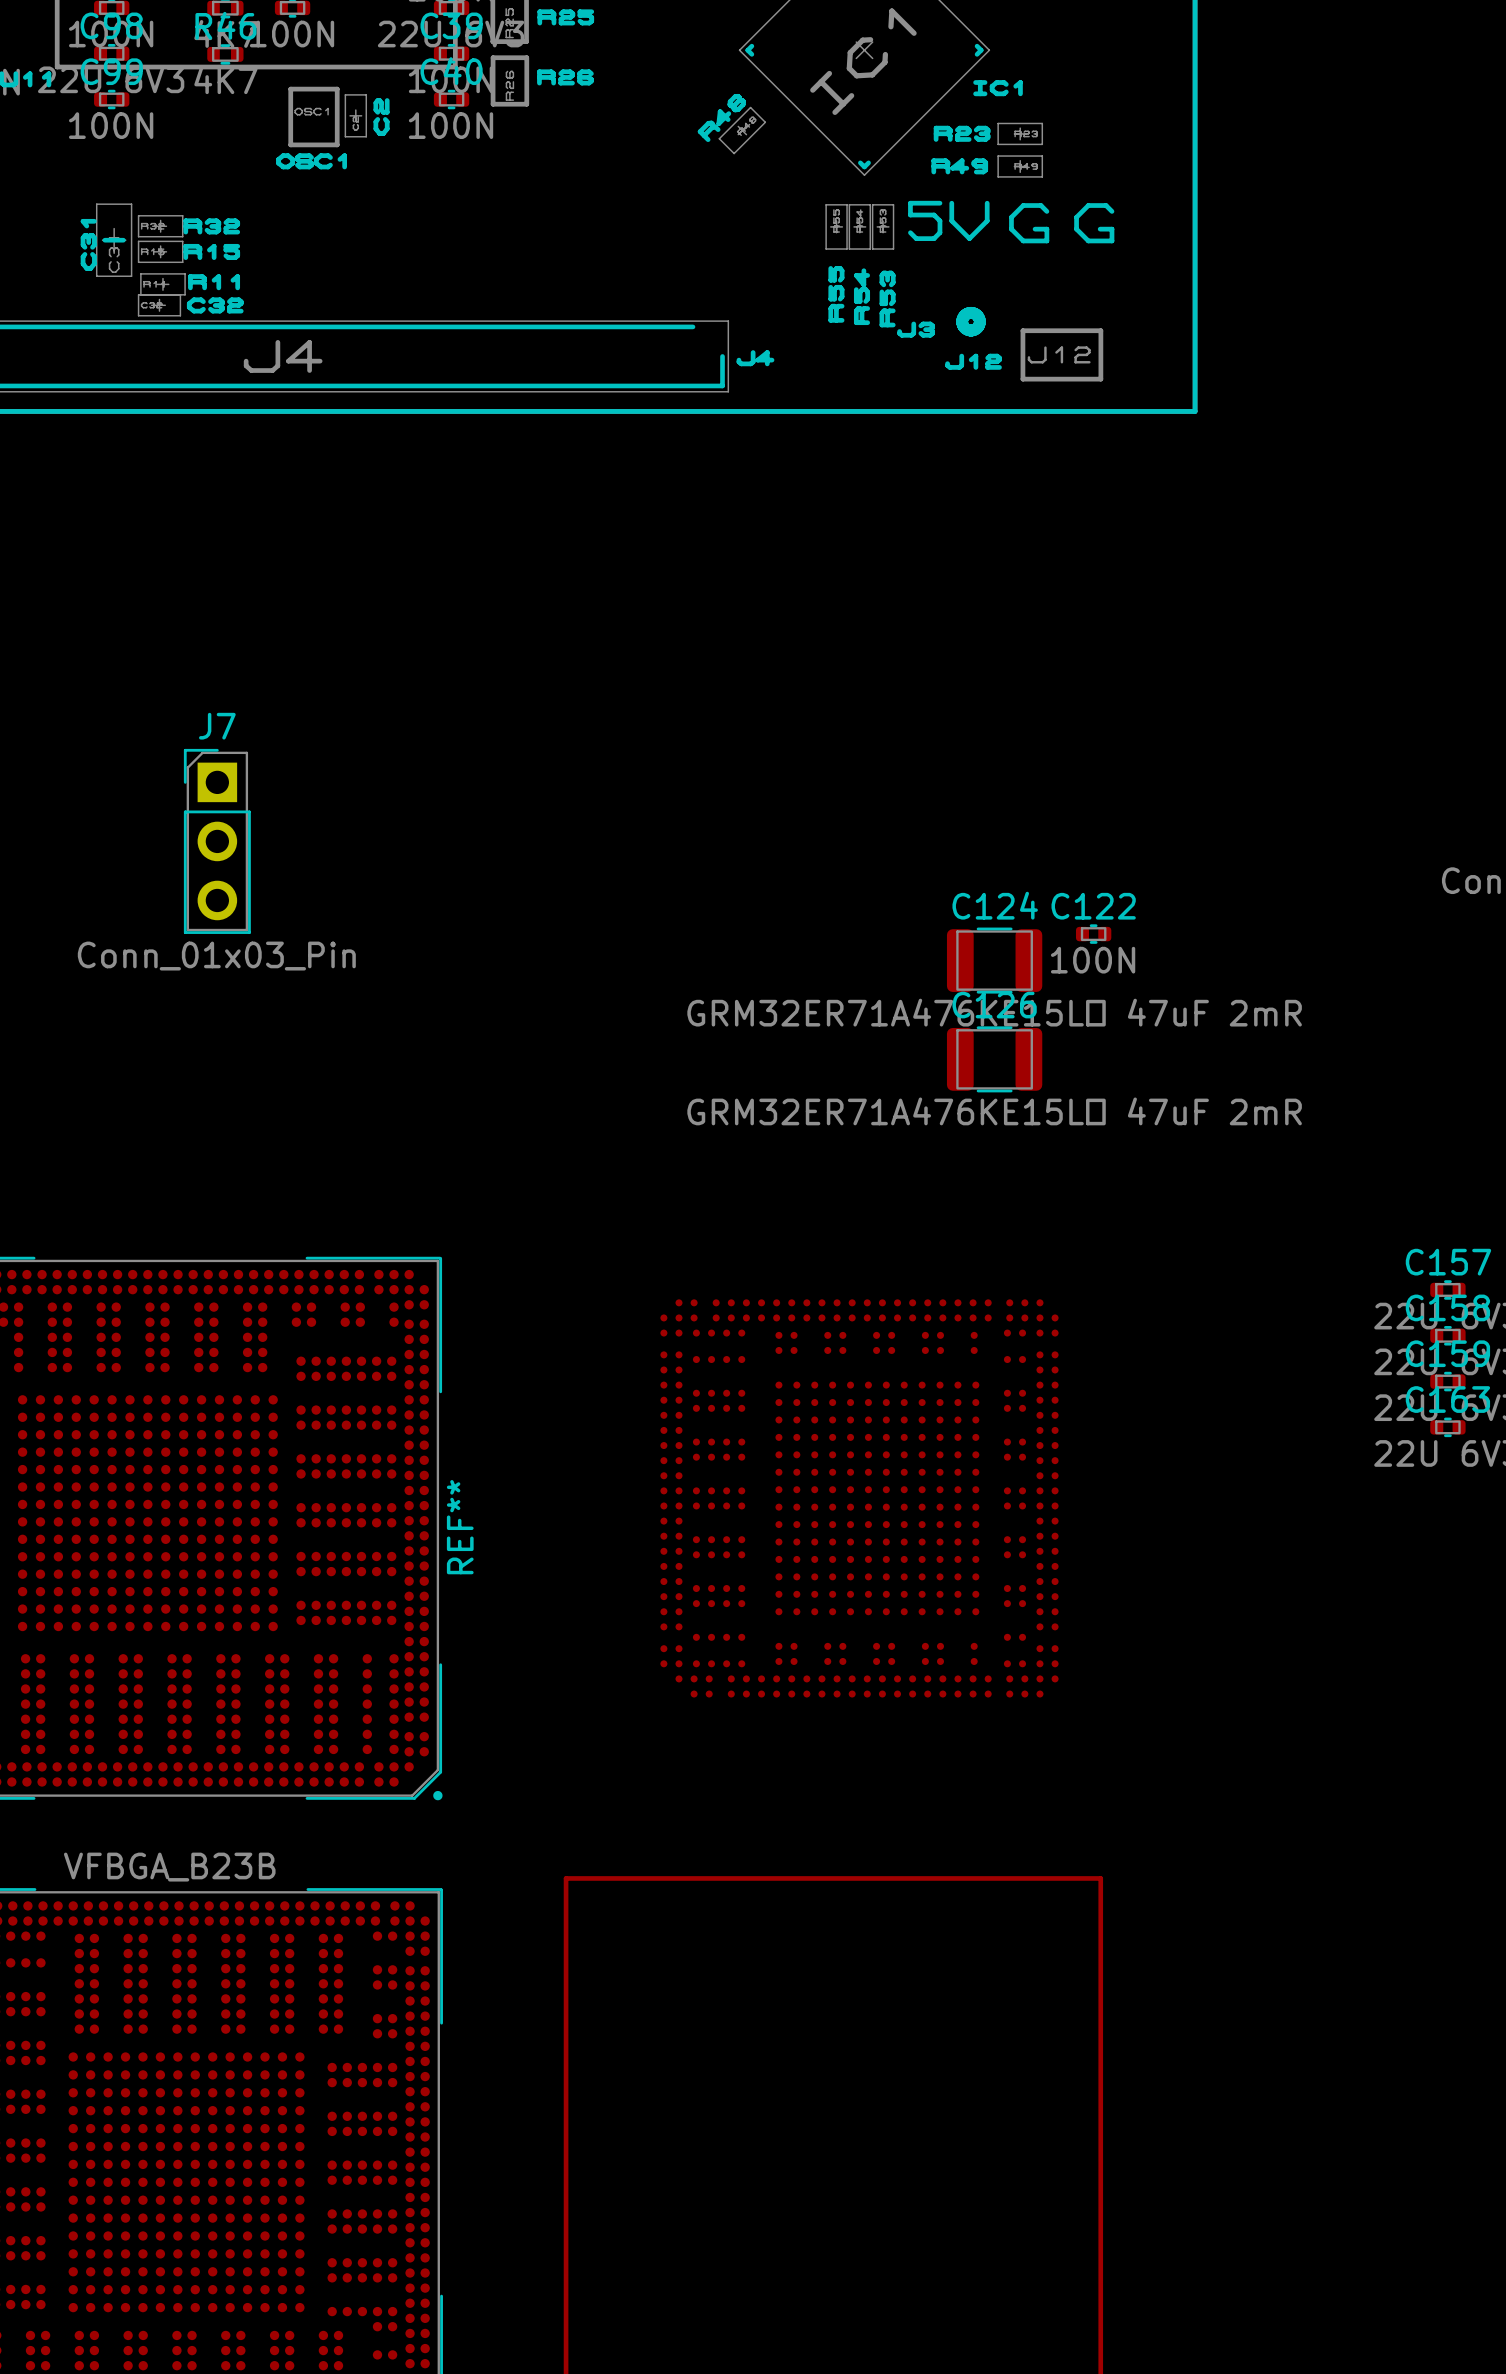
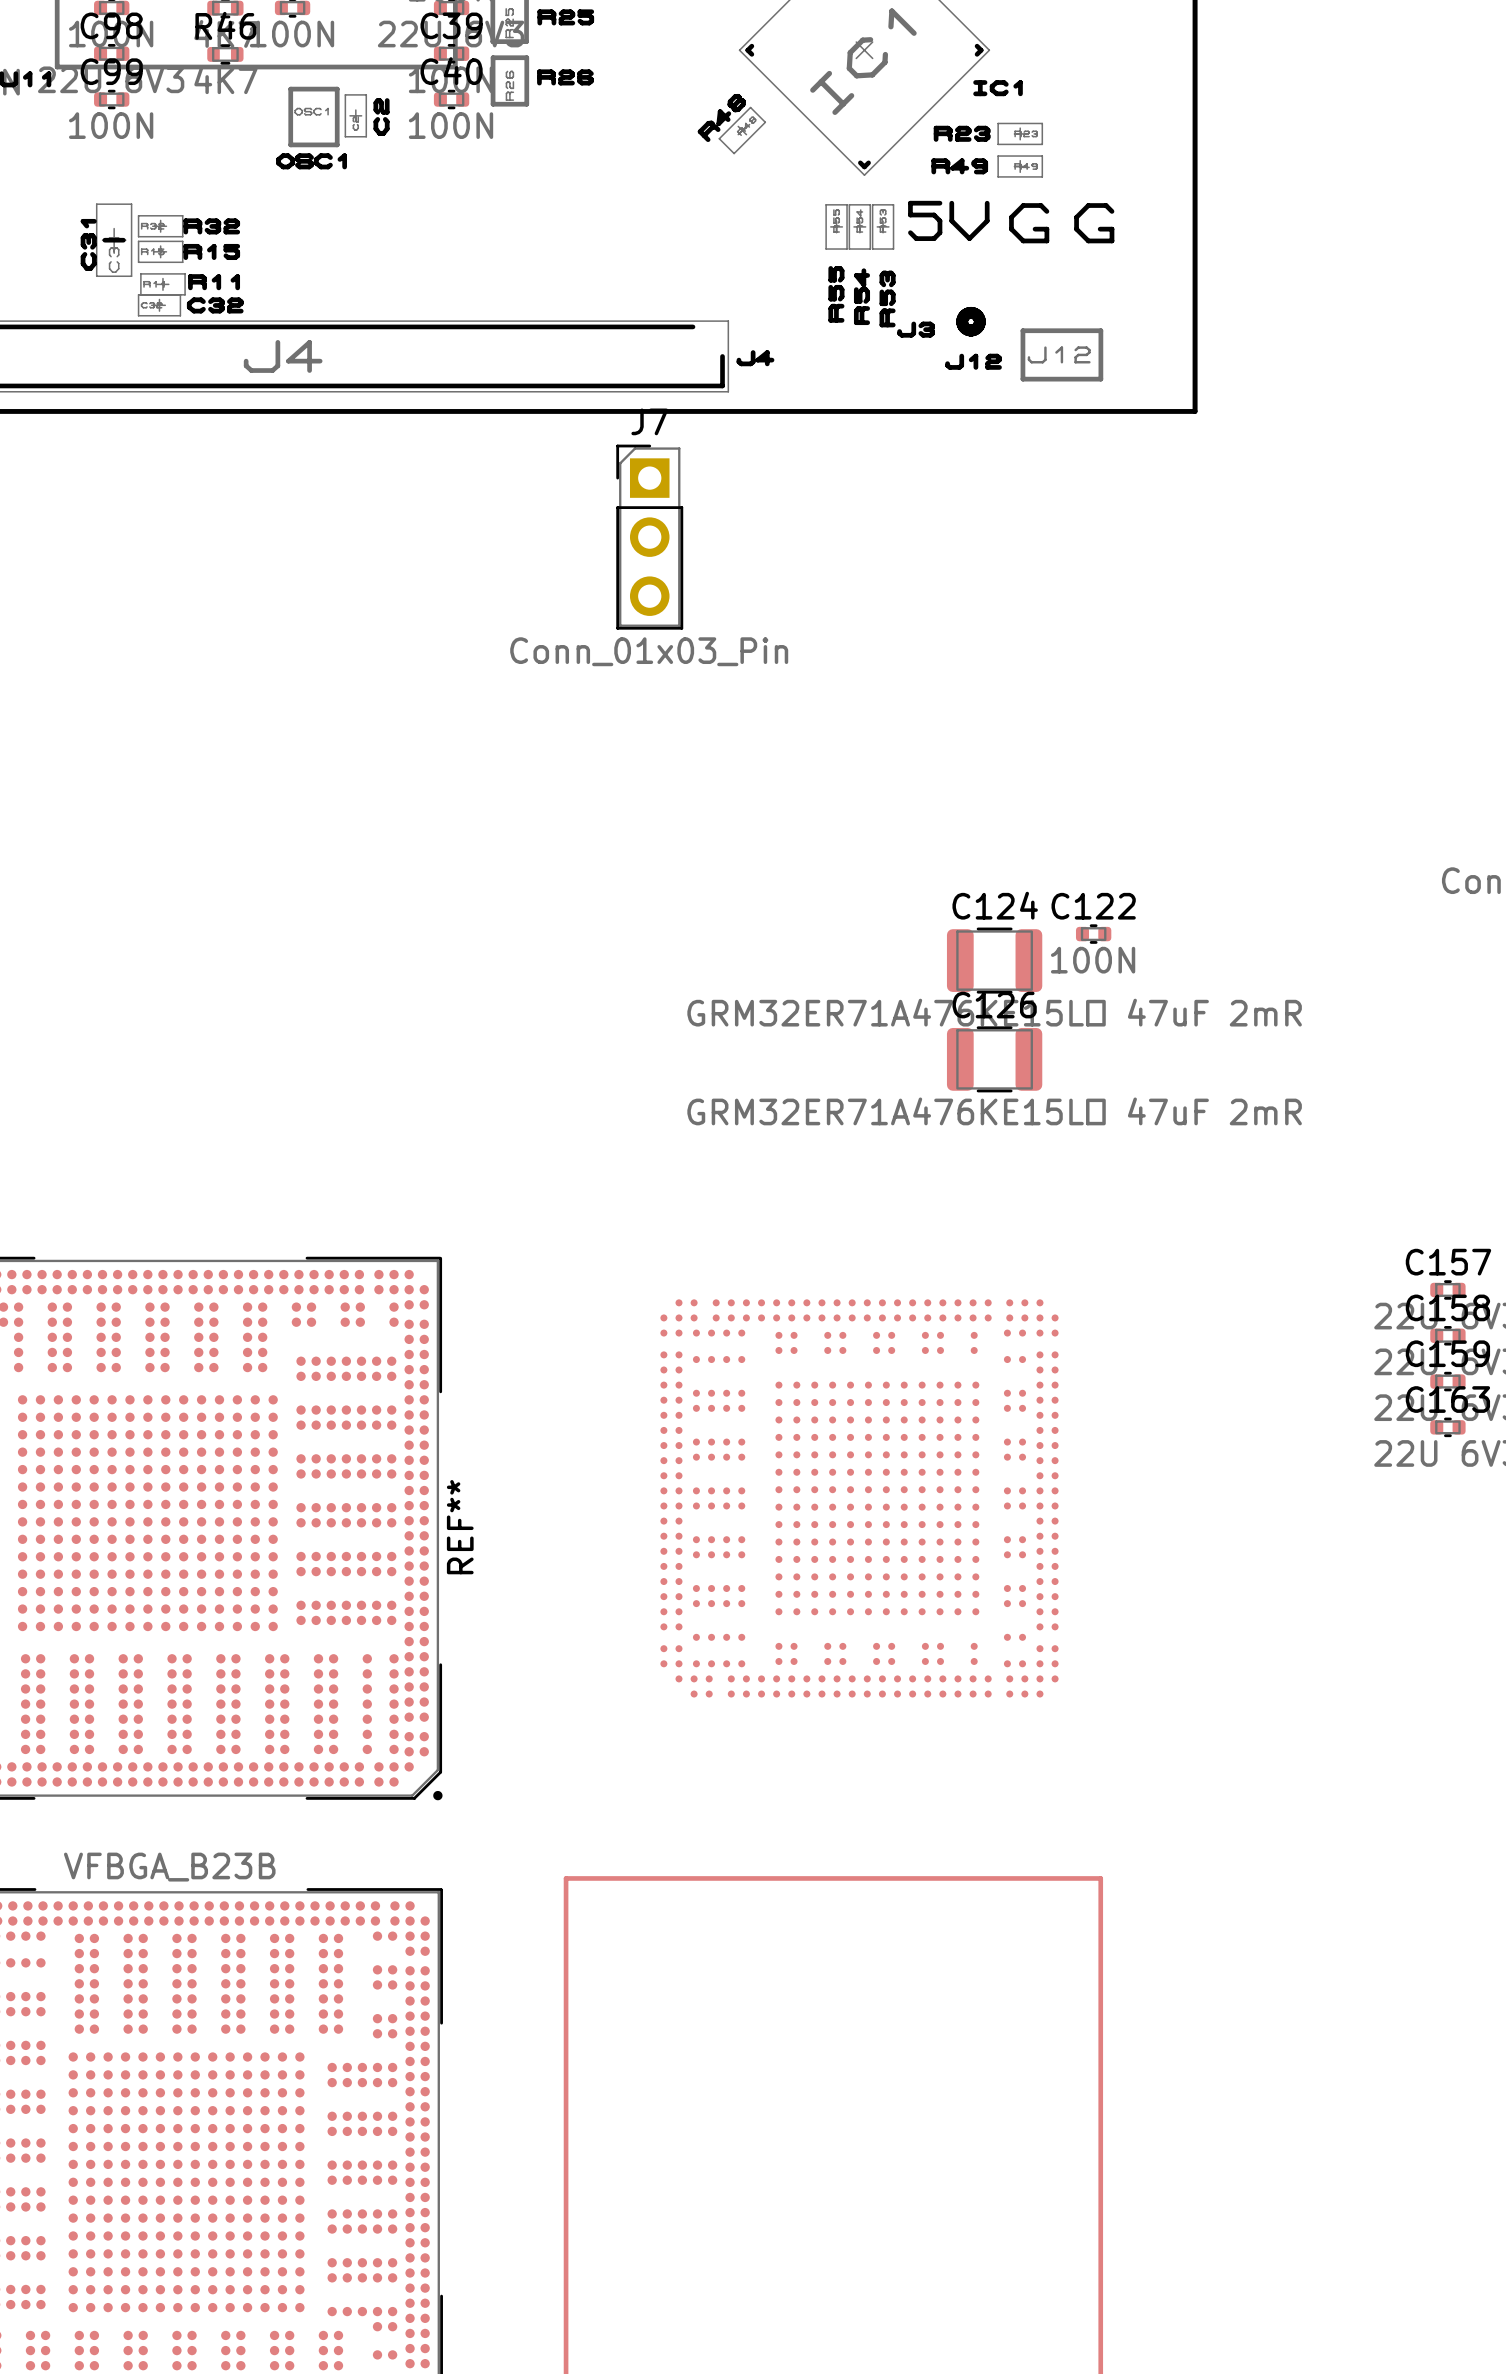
J7 position: (217, 841) -> (649, 537)

